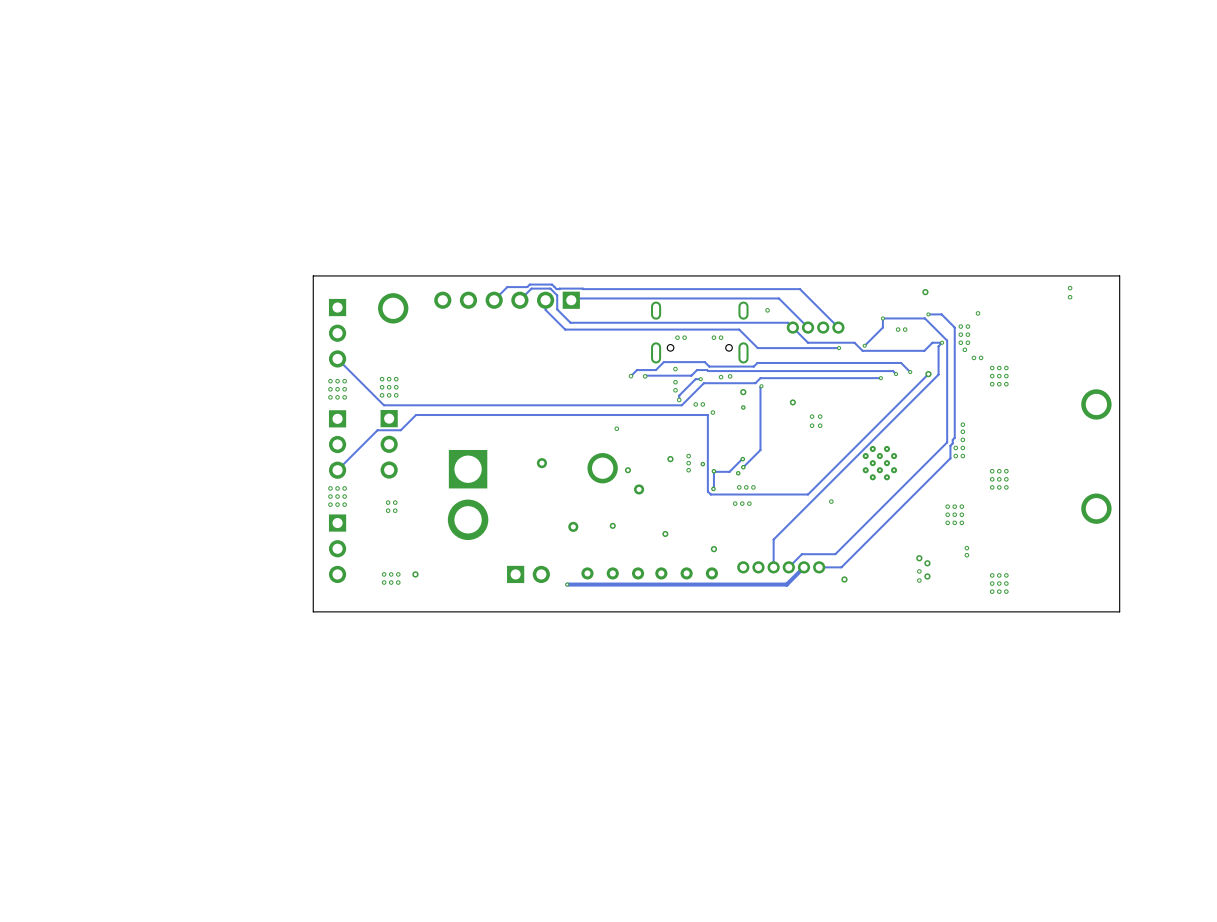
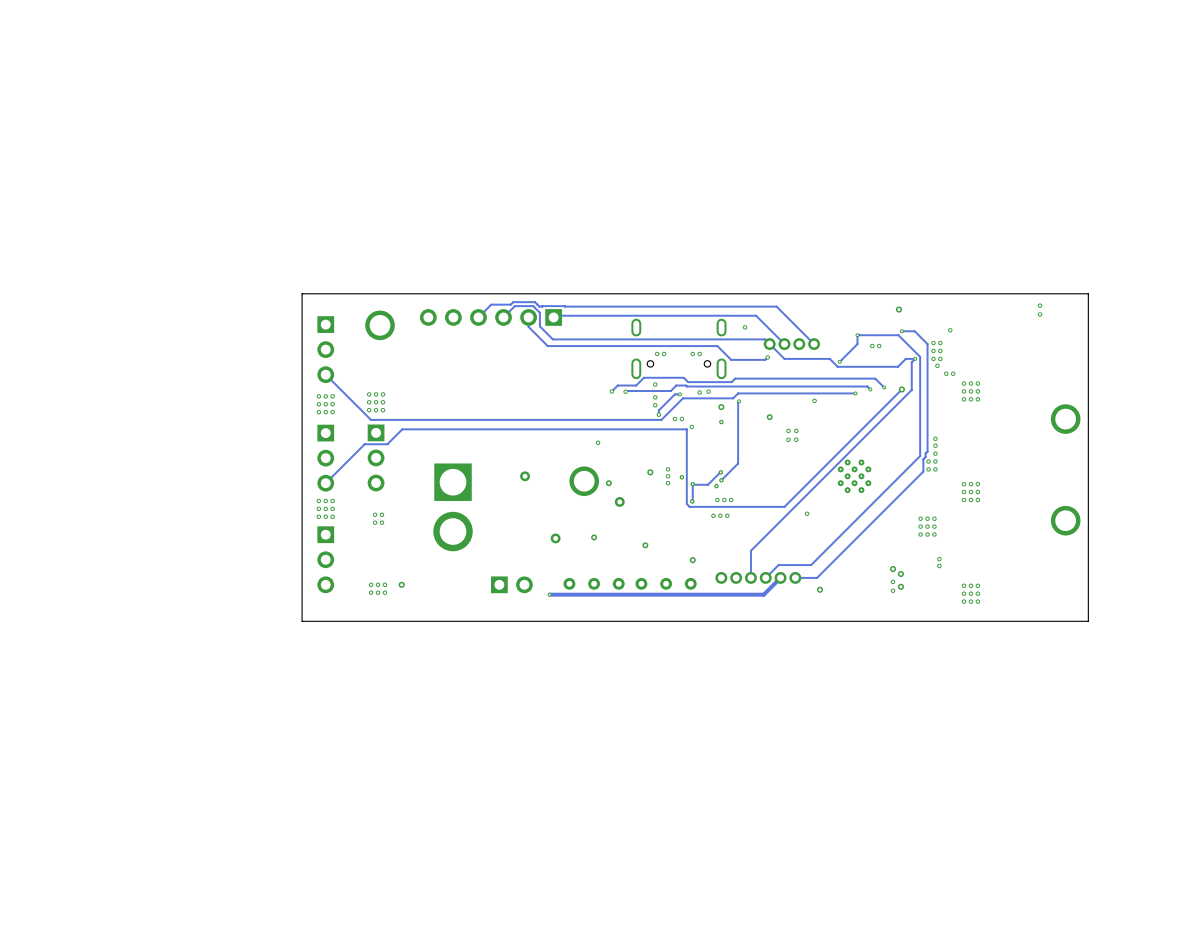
via: none -> (767, 357)
track: (753, 343) (757, 348) (839, 348) -> (731, 359) (765, 359) (767, 357)
via: (839, 348) -> none
via: none -> (814, 400)

